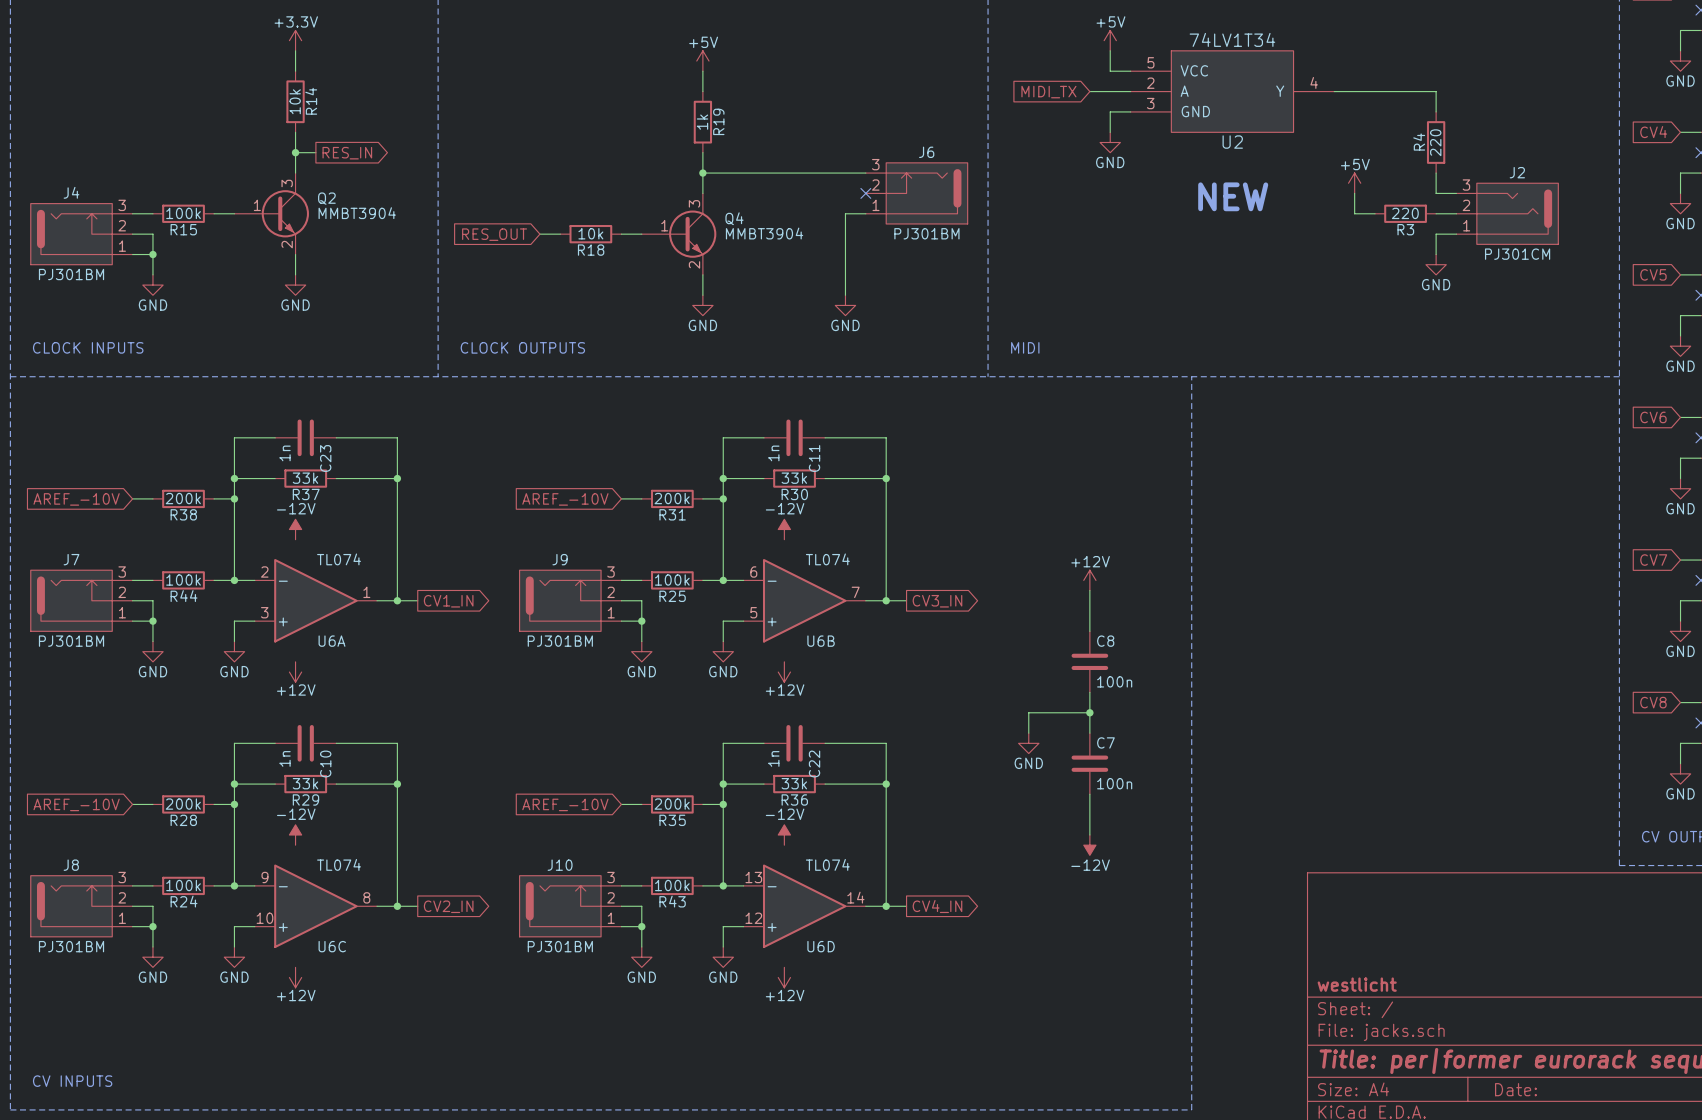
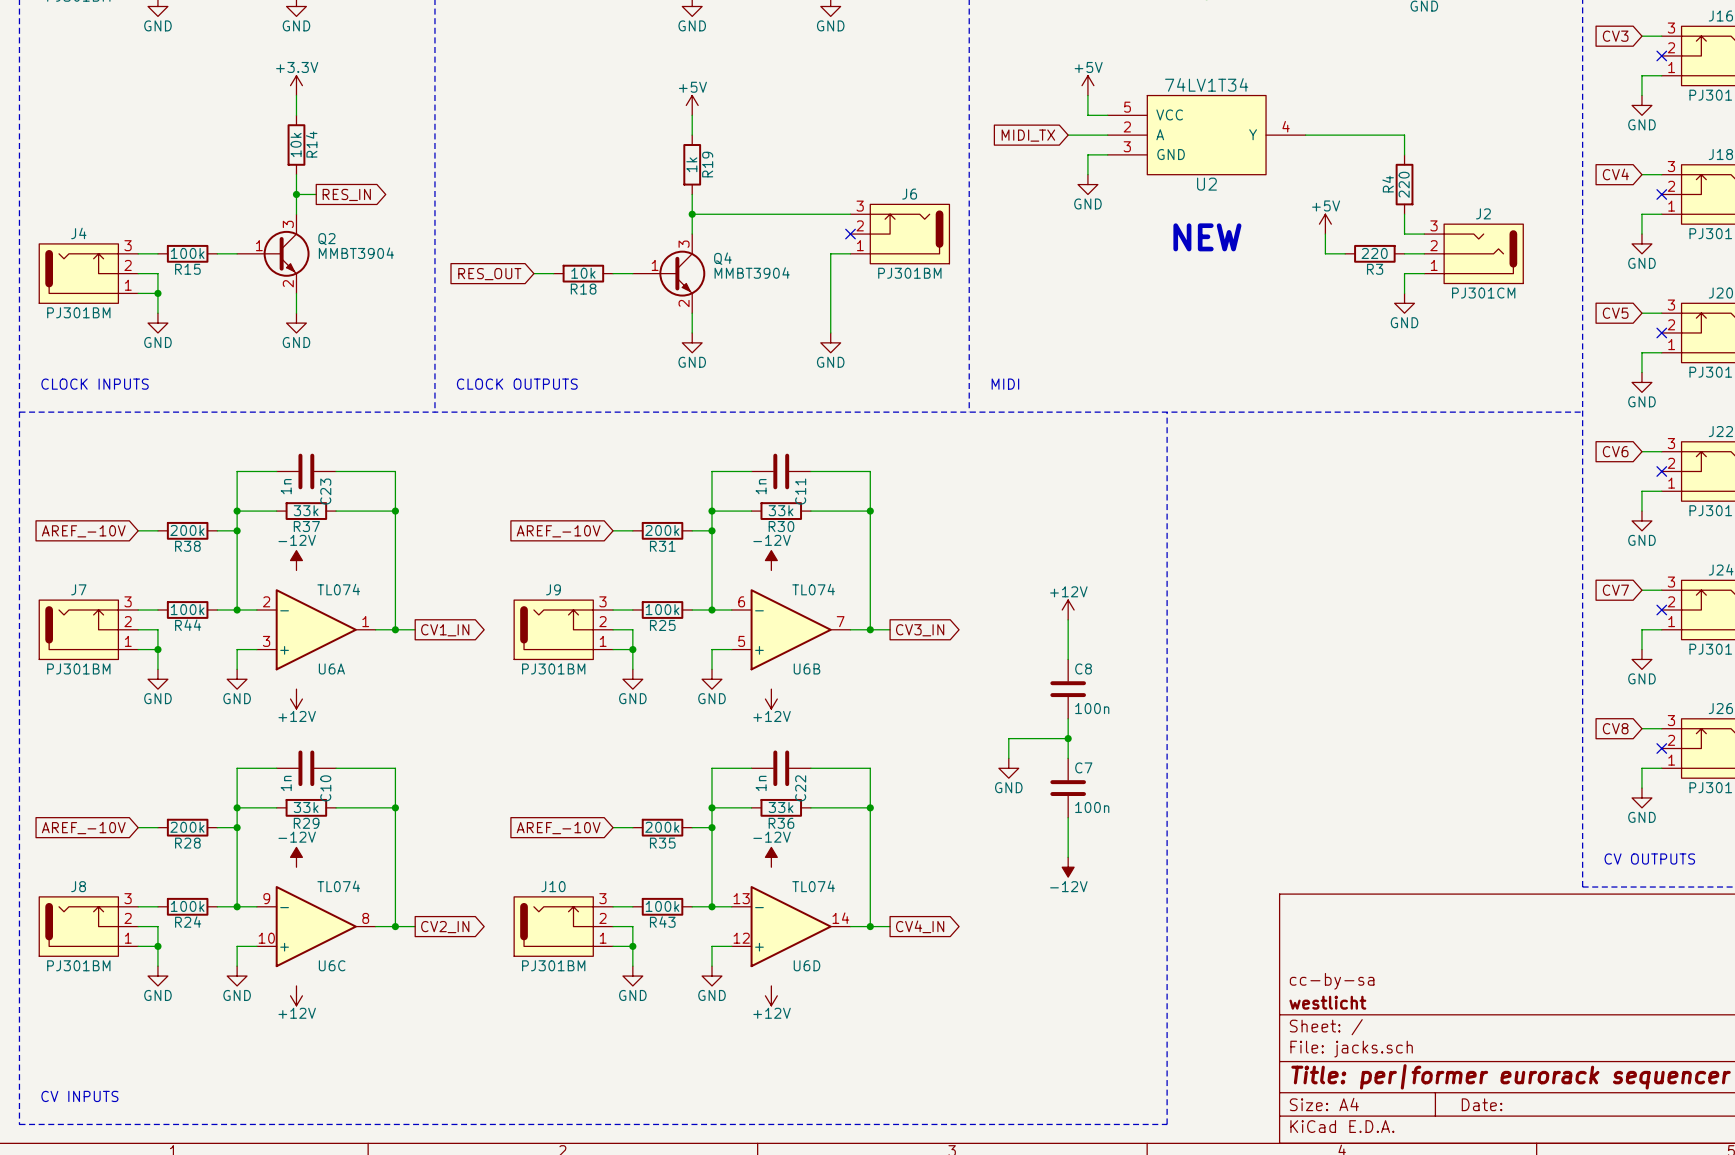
title block: none -> cc-by-sa (1332, 981)

